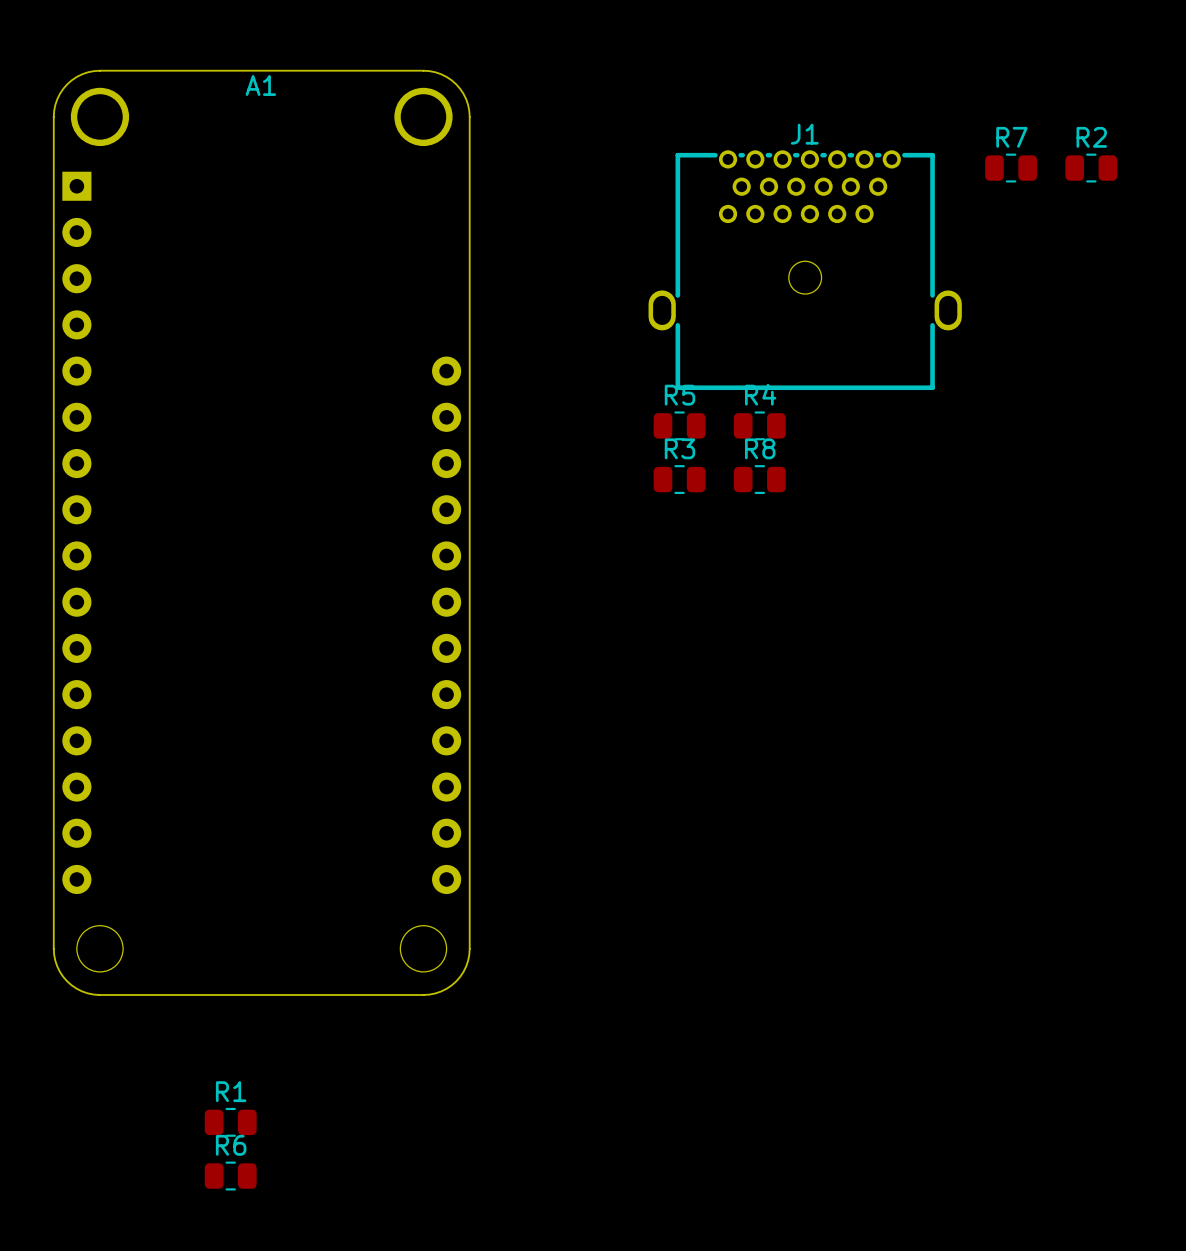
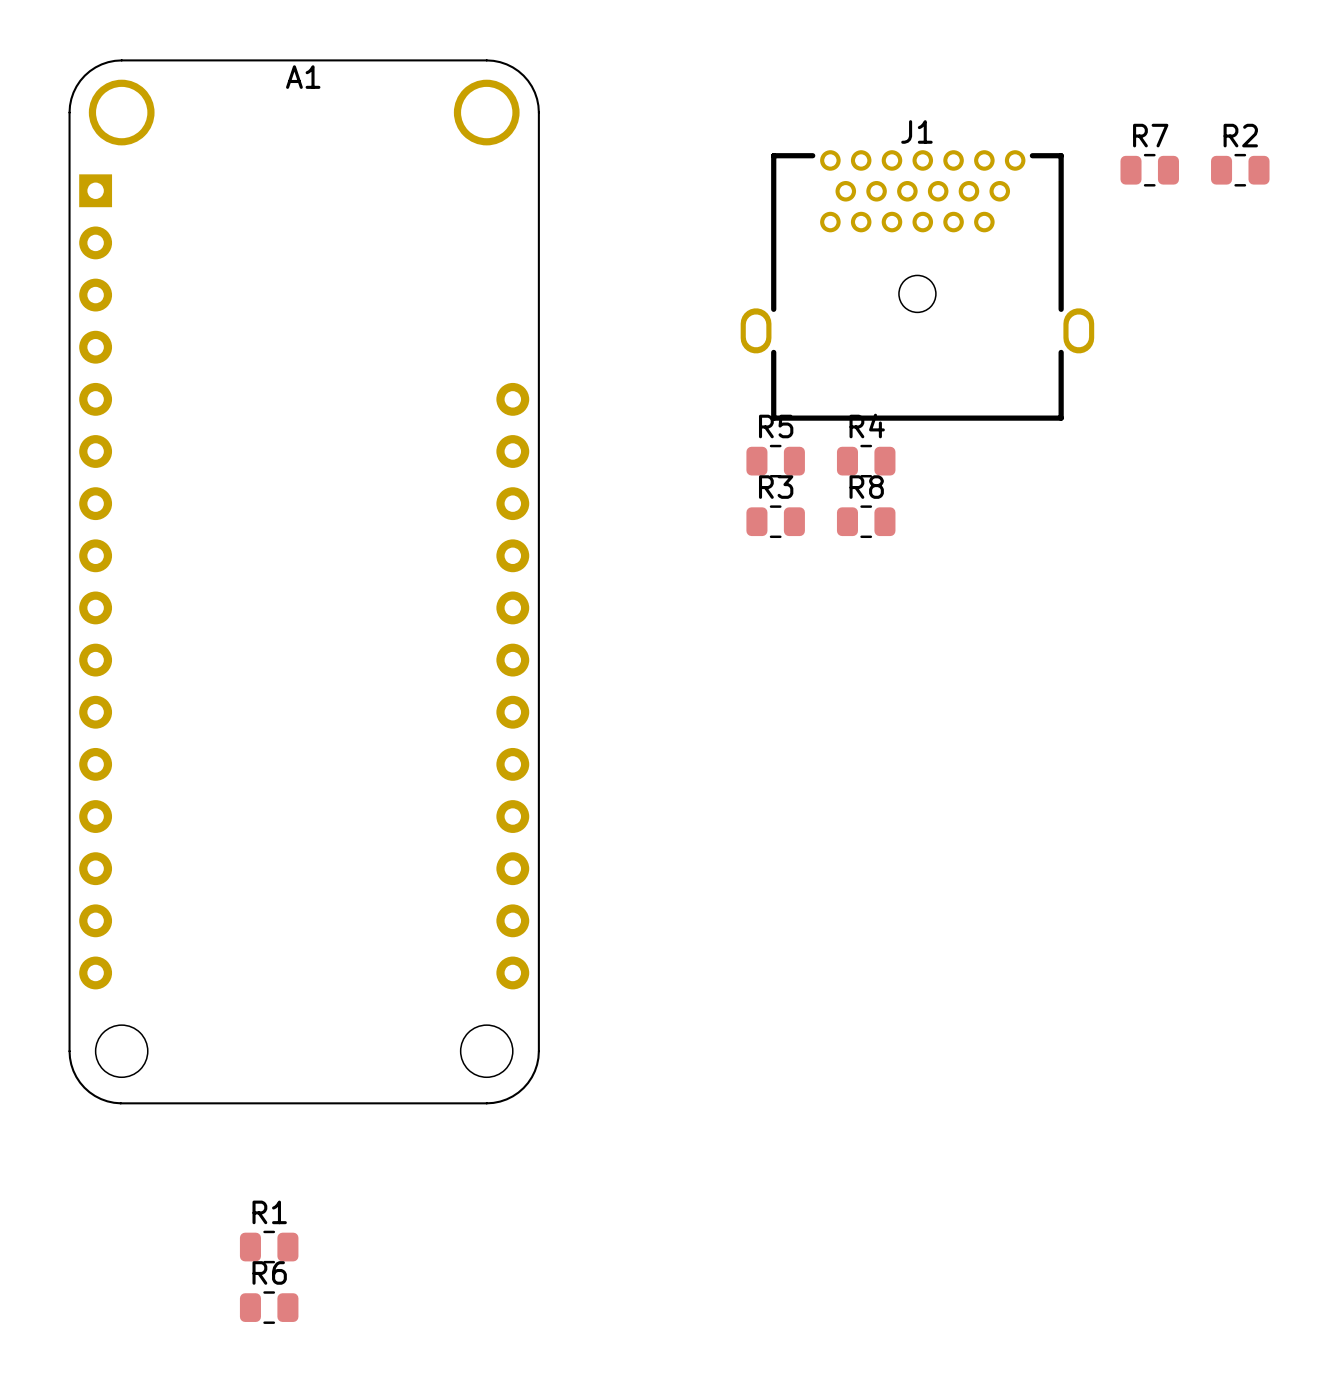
J1 footprint: [648, 150, 962, 391] -> [740, 150, 1095, 421]

